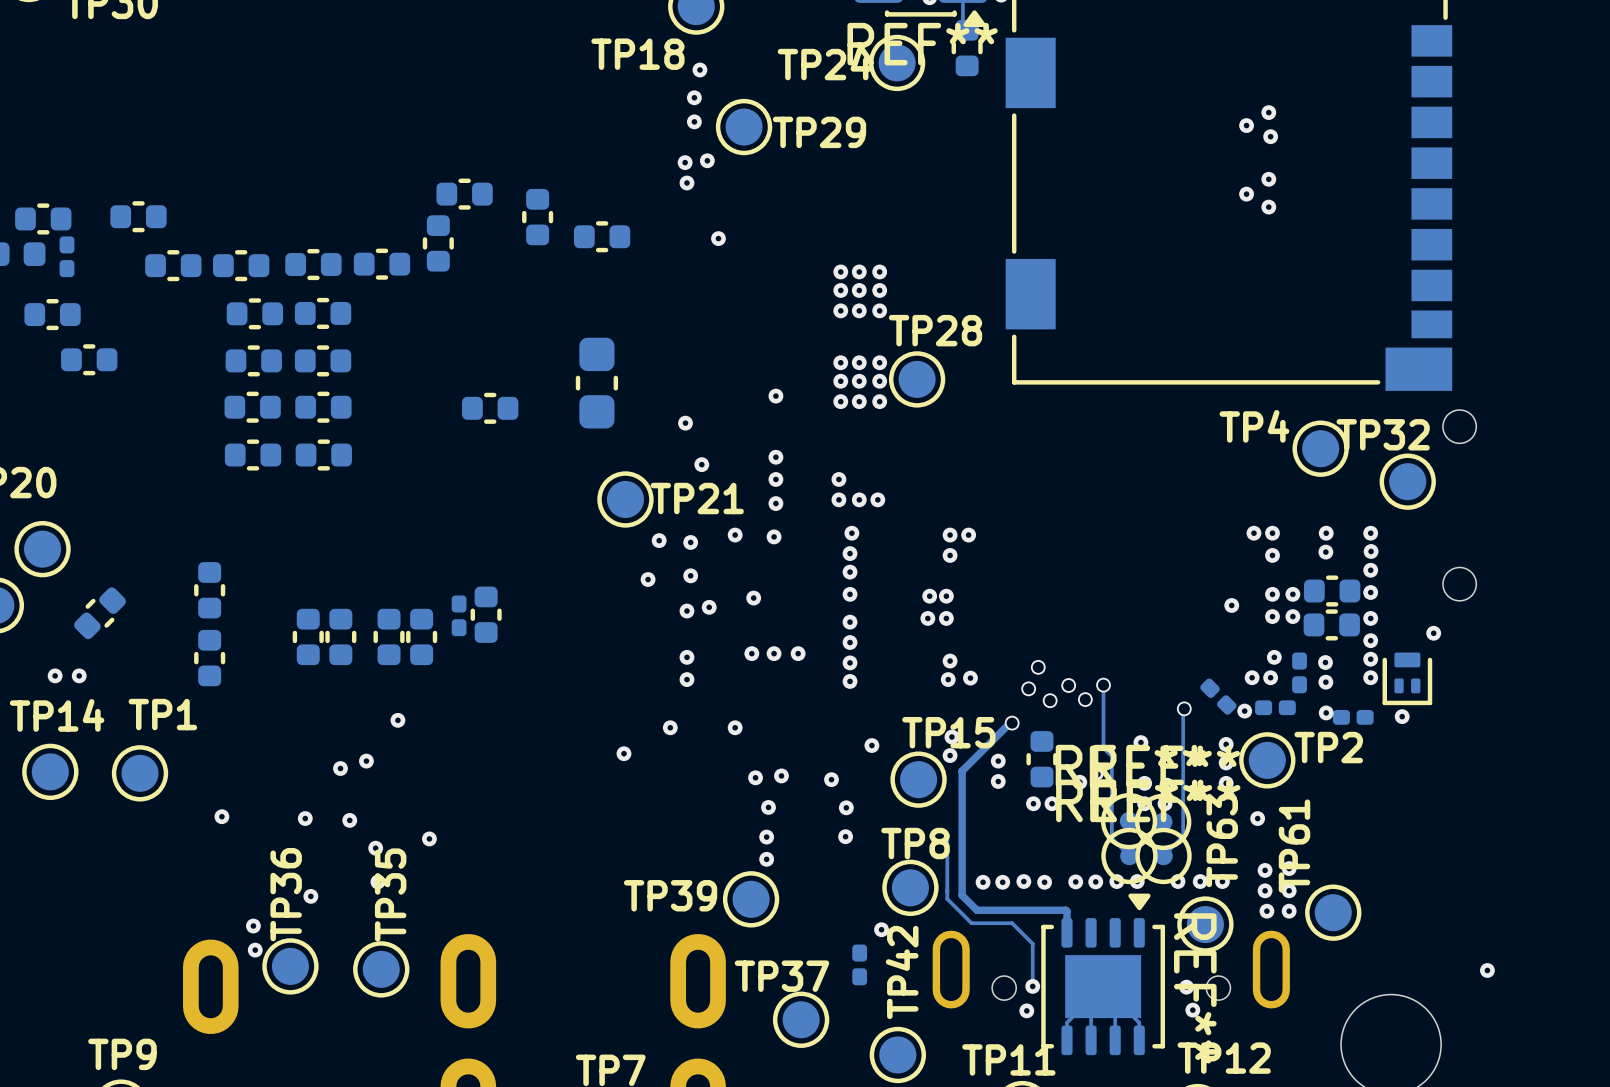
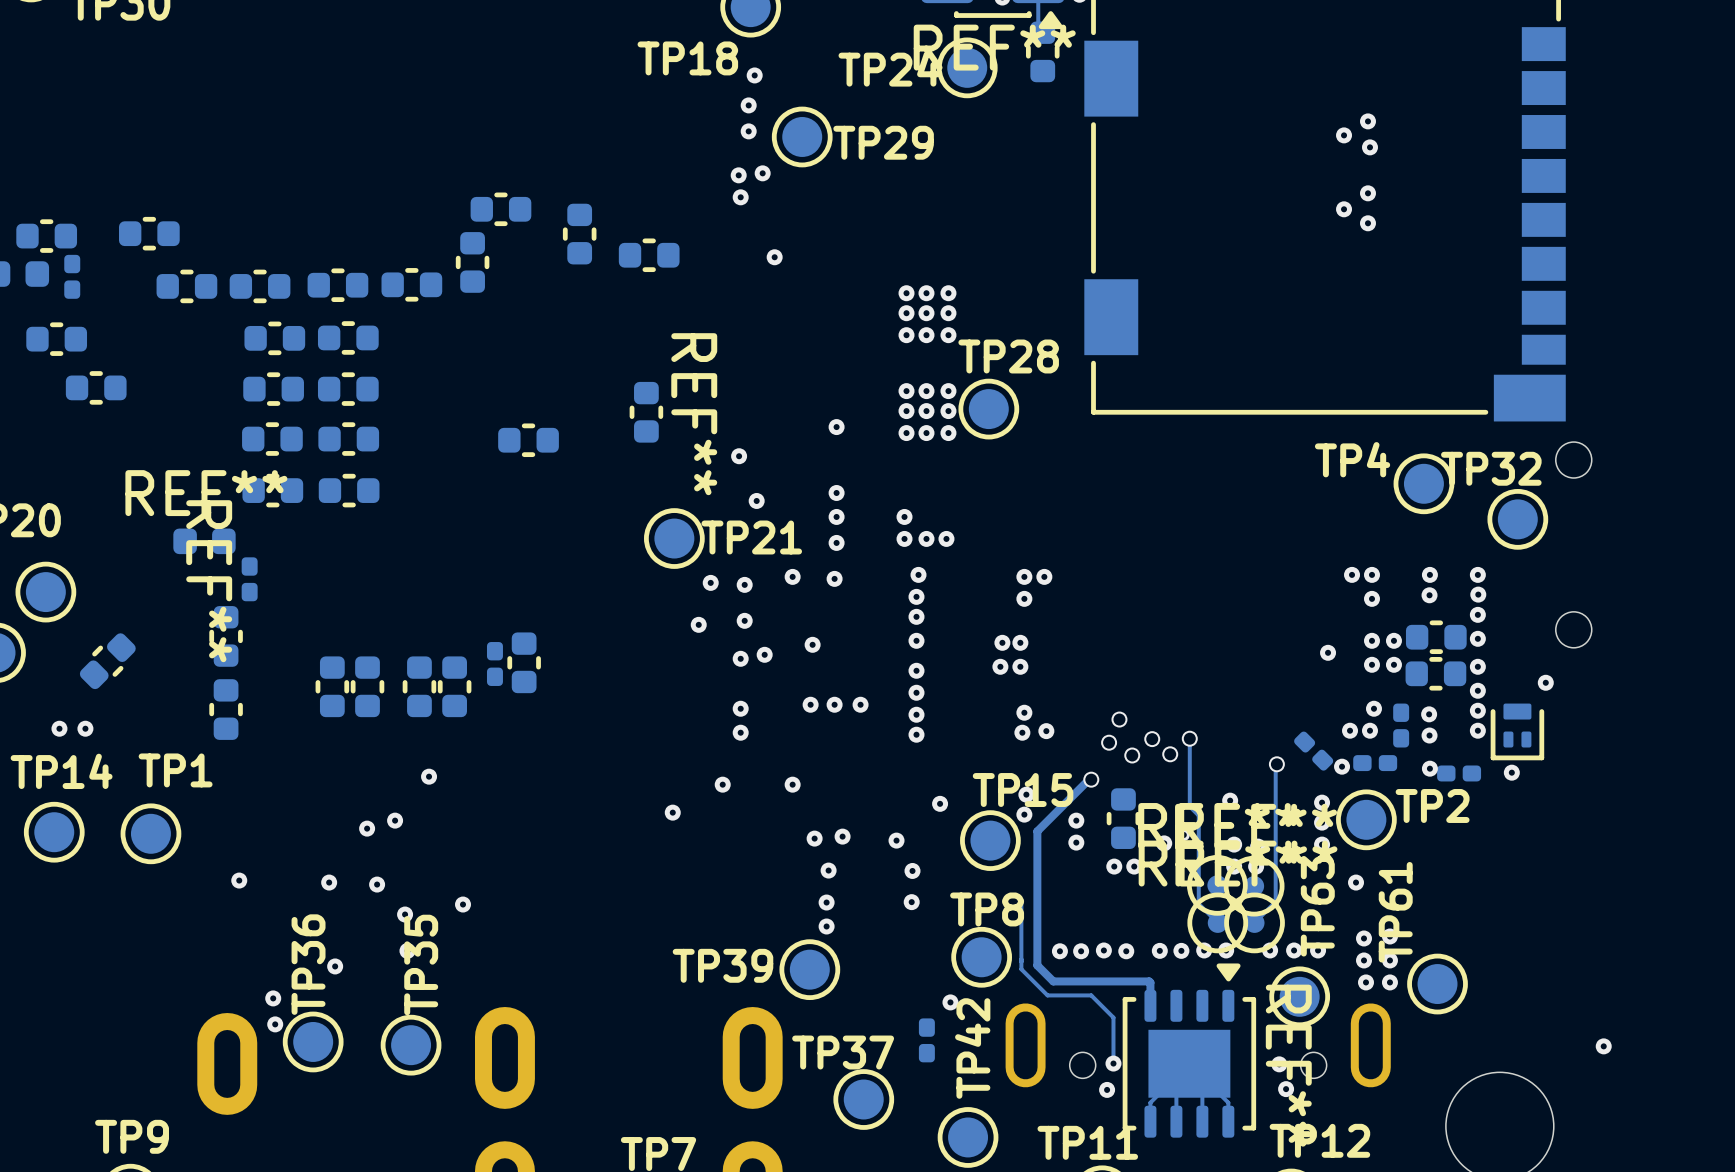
REF**: none -> (646, 412)
part: (596, 383) -> none
REF**: none -> (204, 541)
REF**: none -> (249, 579)

